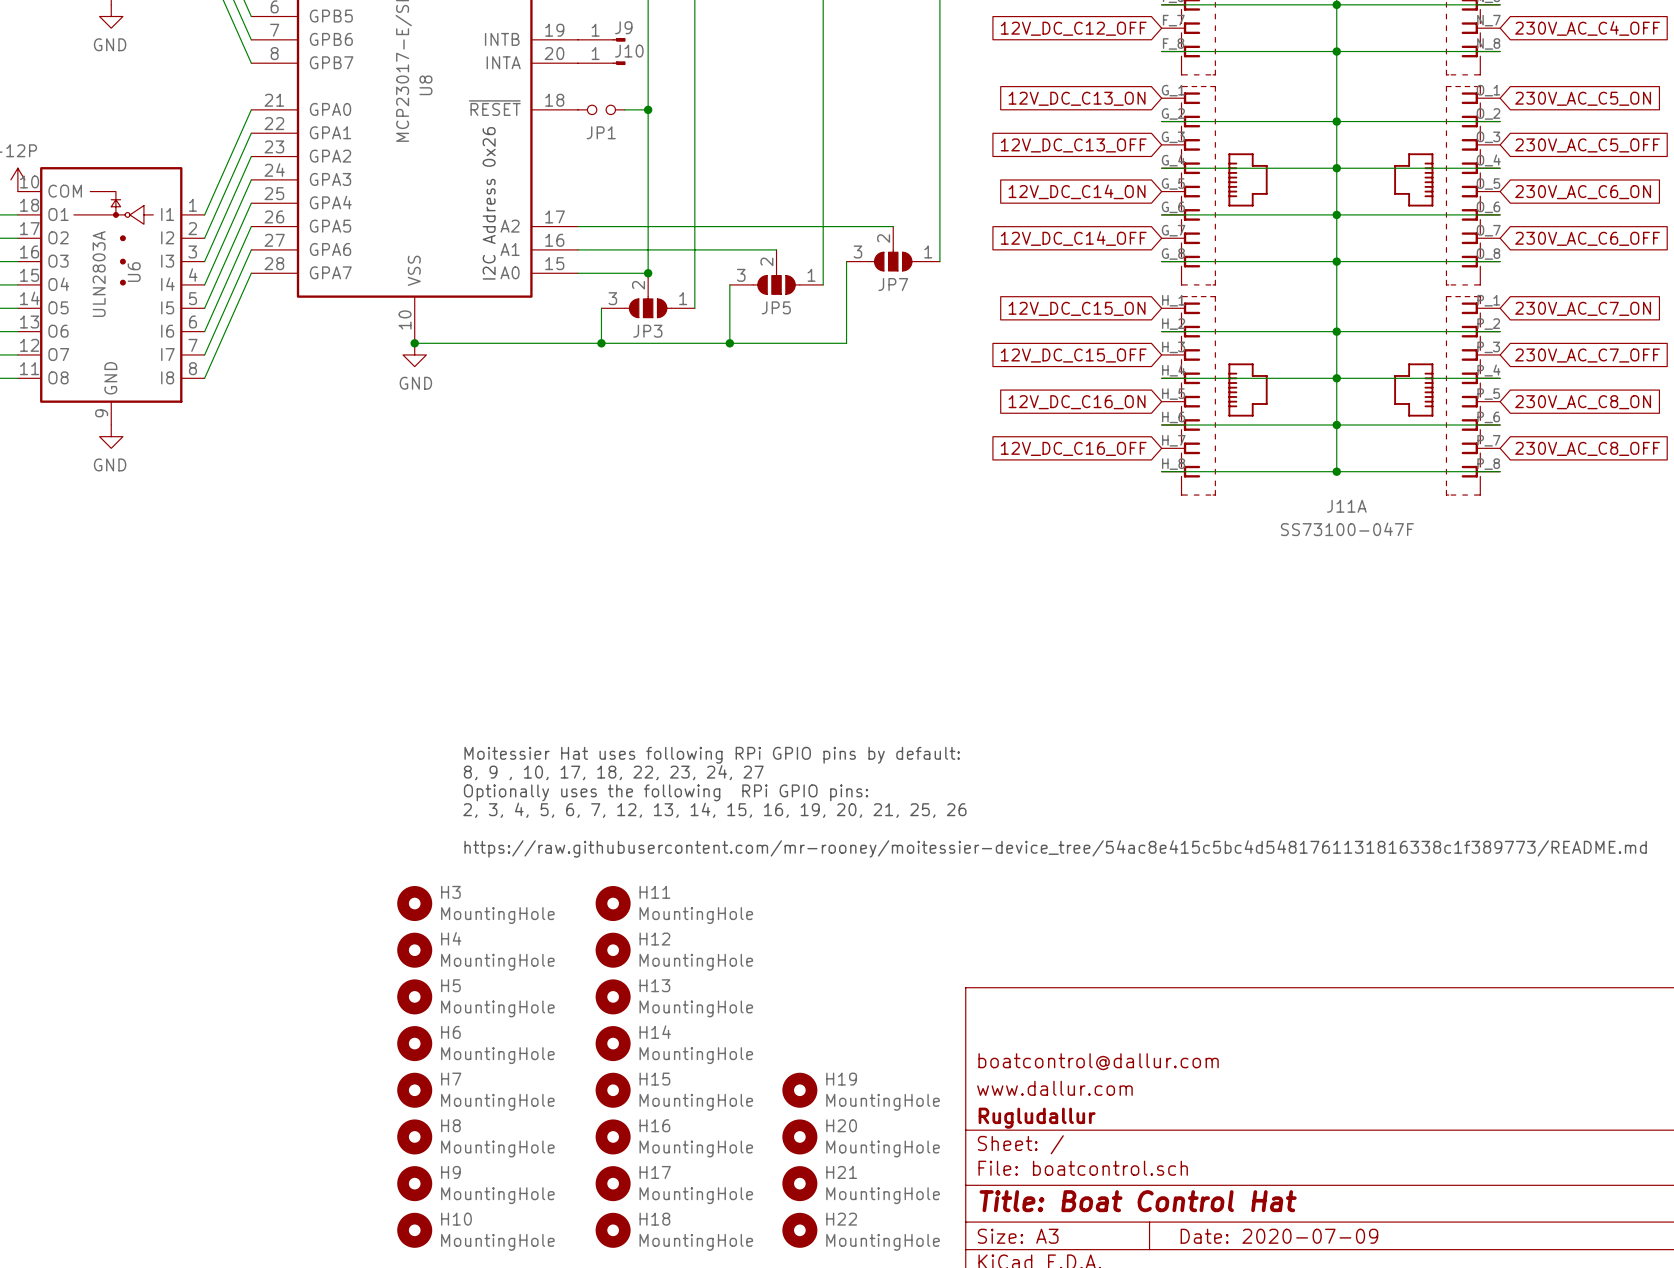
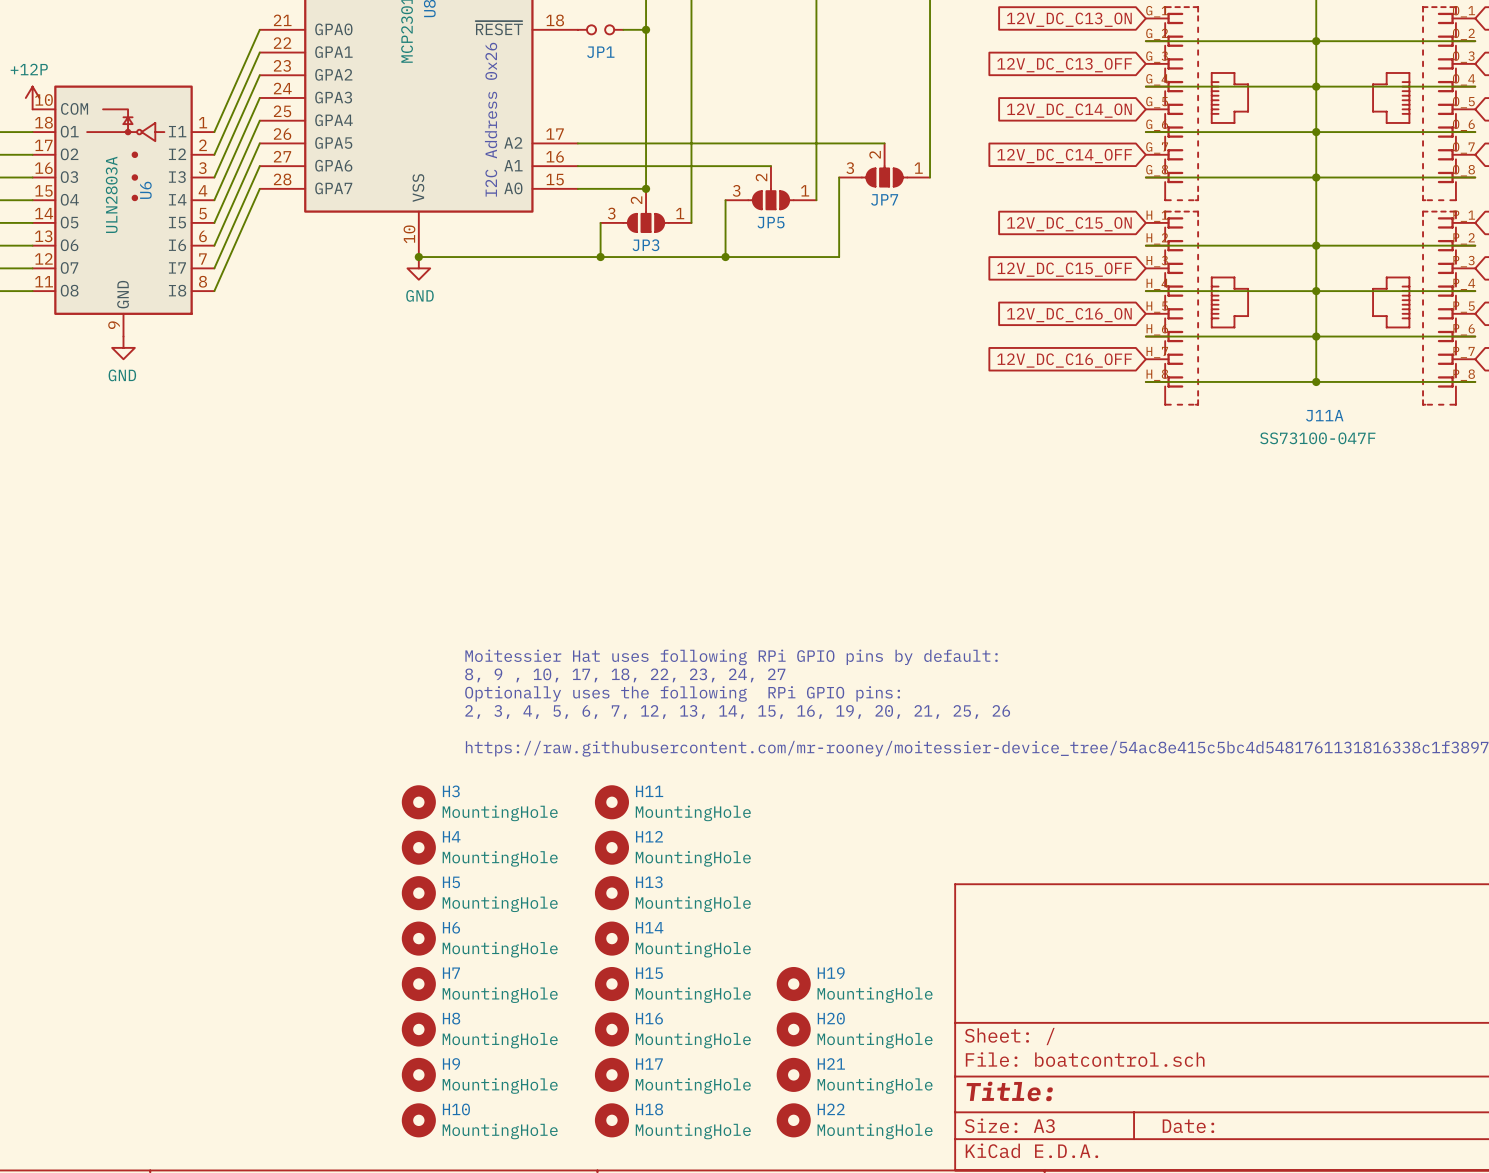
title block: boatcontrol@dallur.com (1098, 1061) -> none
title block: www.dallur.com (1054, 1088) -> none
title block: Rugludallur (1037, 1118) -> none
title block: Title: Boat Control Hat (1138, 1201) -> Title: (1009, 1091)
title block: Date: 2020-07-09 (1279, 1236) -> Date: (1188, 1126)

